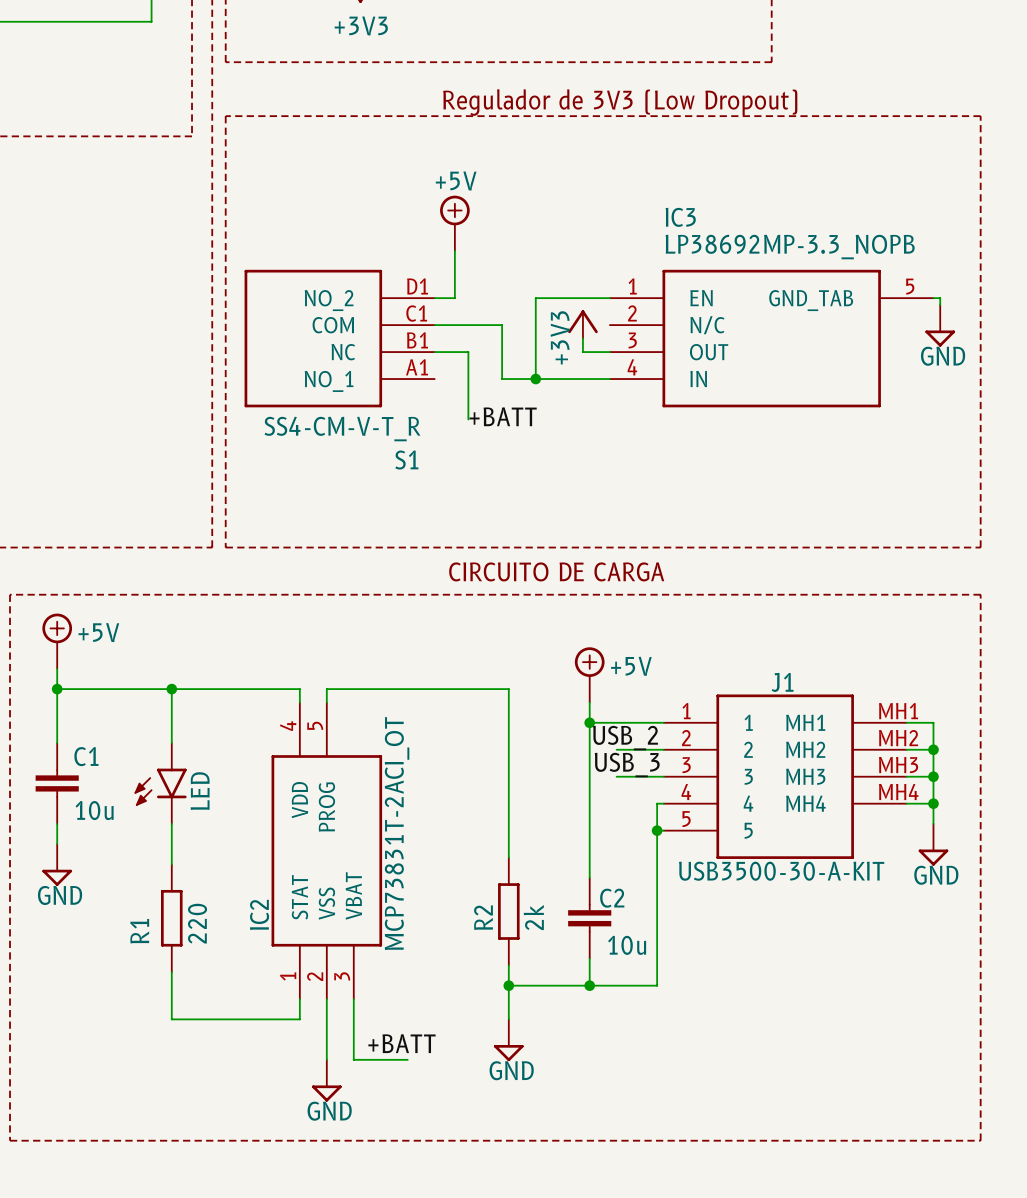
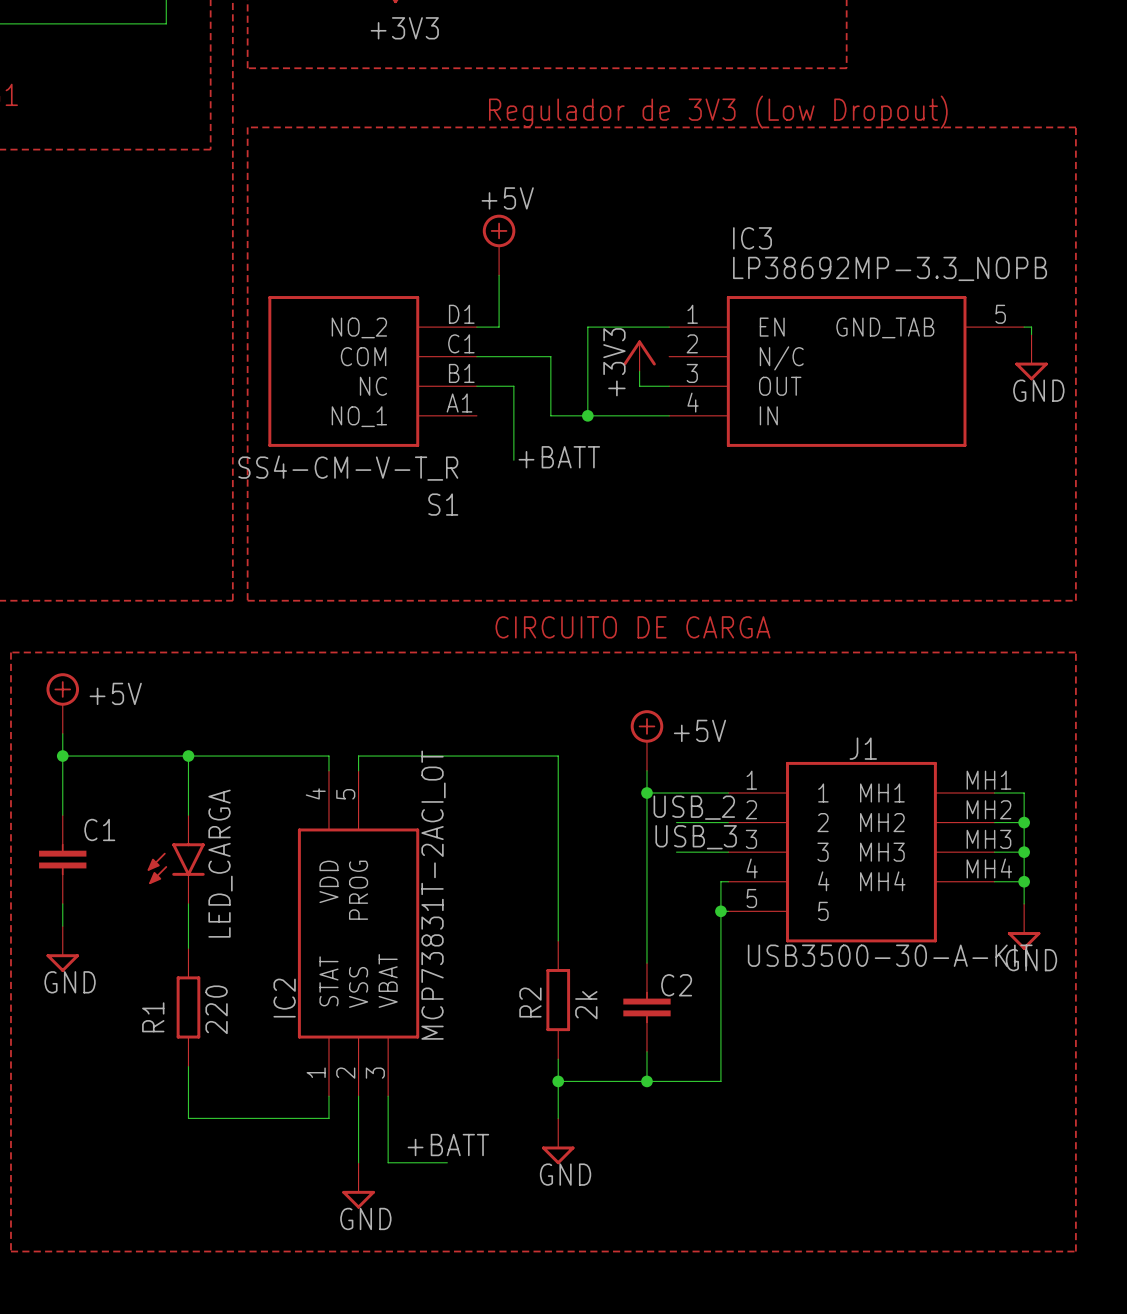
LED name: LED (200, 791) -> LED_CARGA (220, 863)
C1 value: 10u (94, 810) -> none
C2 value: 10u (627, 945) -> none

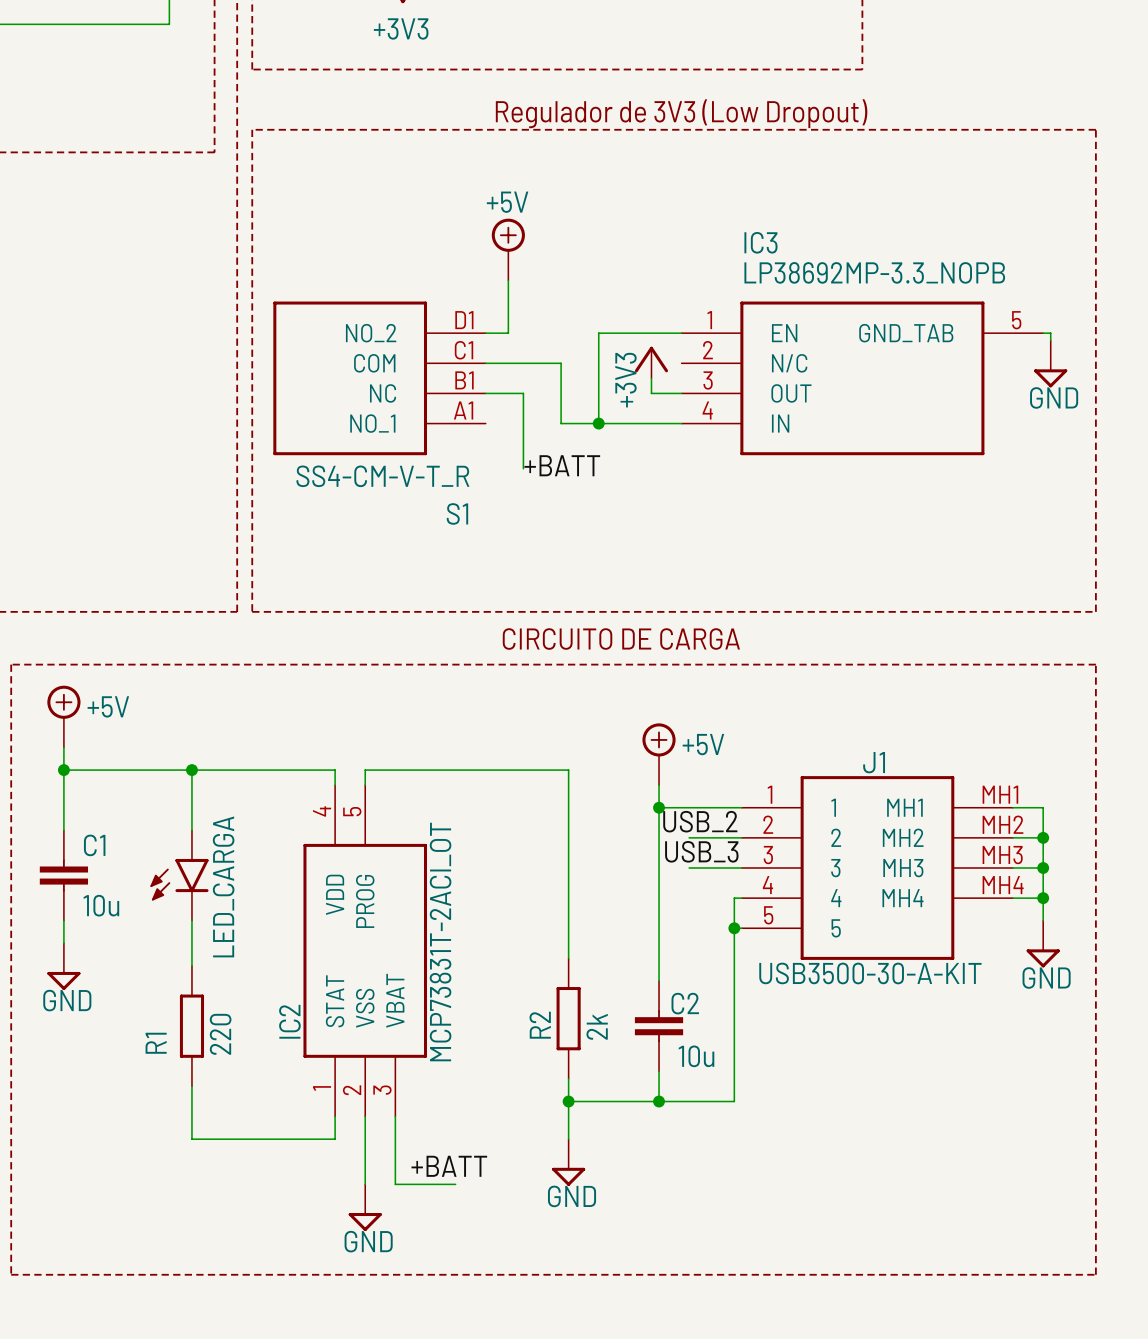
C1 value: none -> 10u (101, 905)
C2 value: none -> 10u (696, 1056)

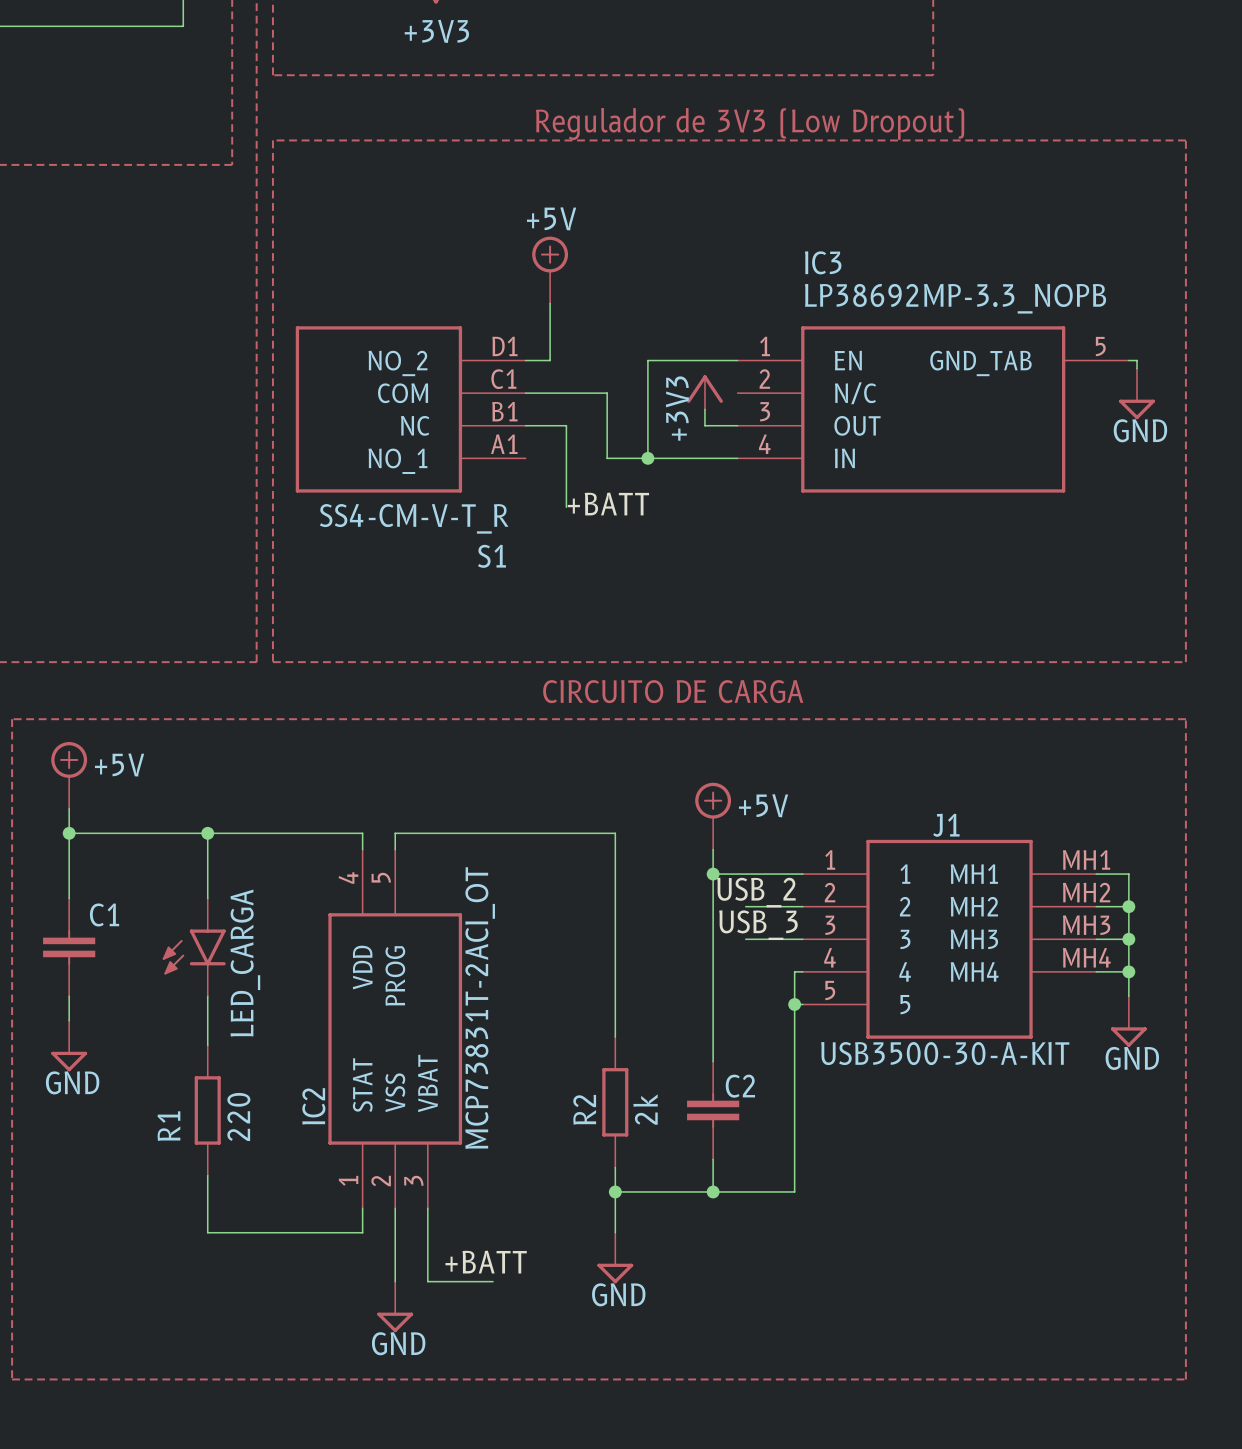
C1 value: 10u (101, 905) -> none
C2 value: 10u (696, 1056) -> none

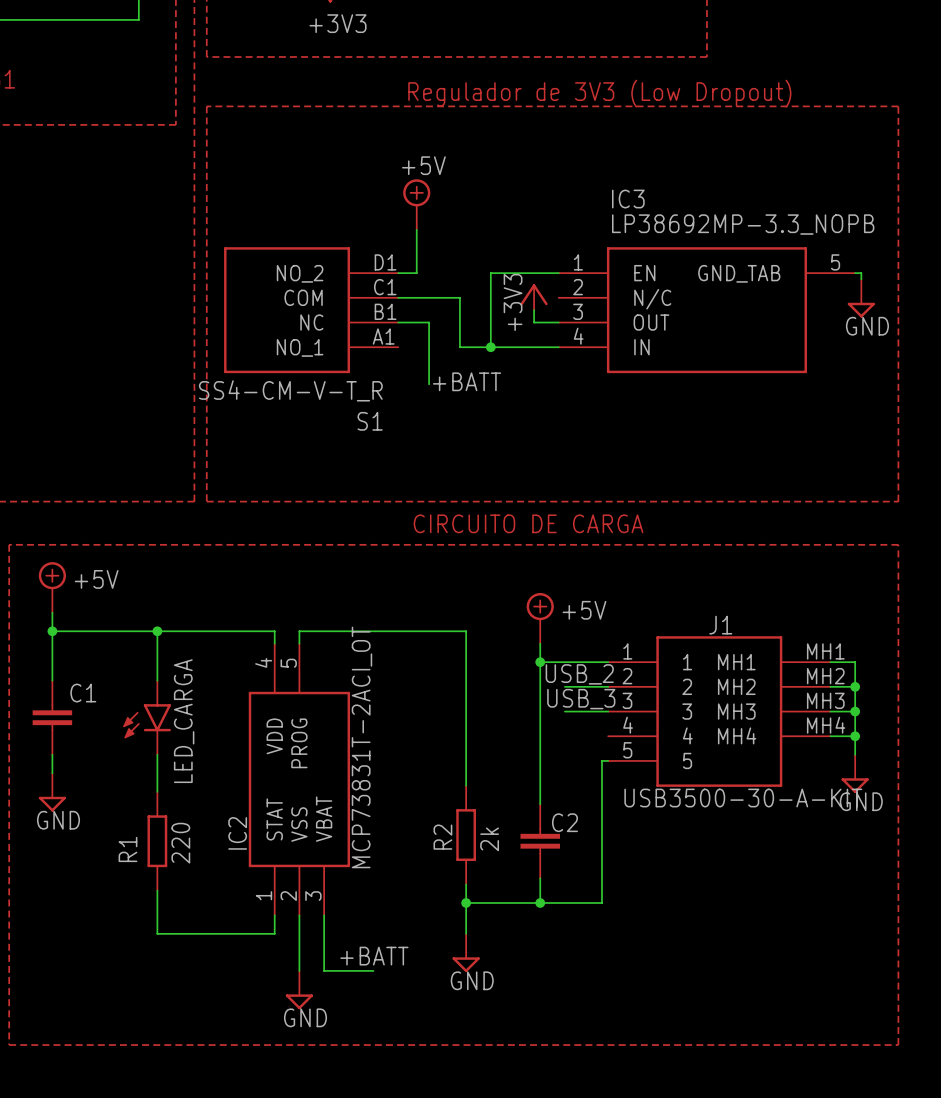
wire: (802, 971) (794, 971) (794, 1004) -> none
junction: (794, 1004) -> none

